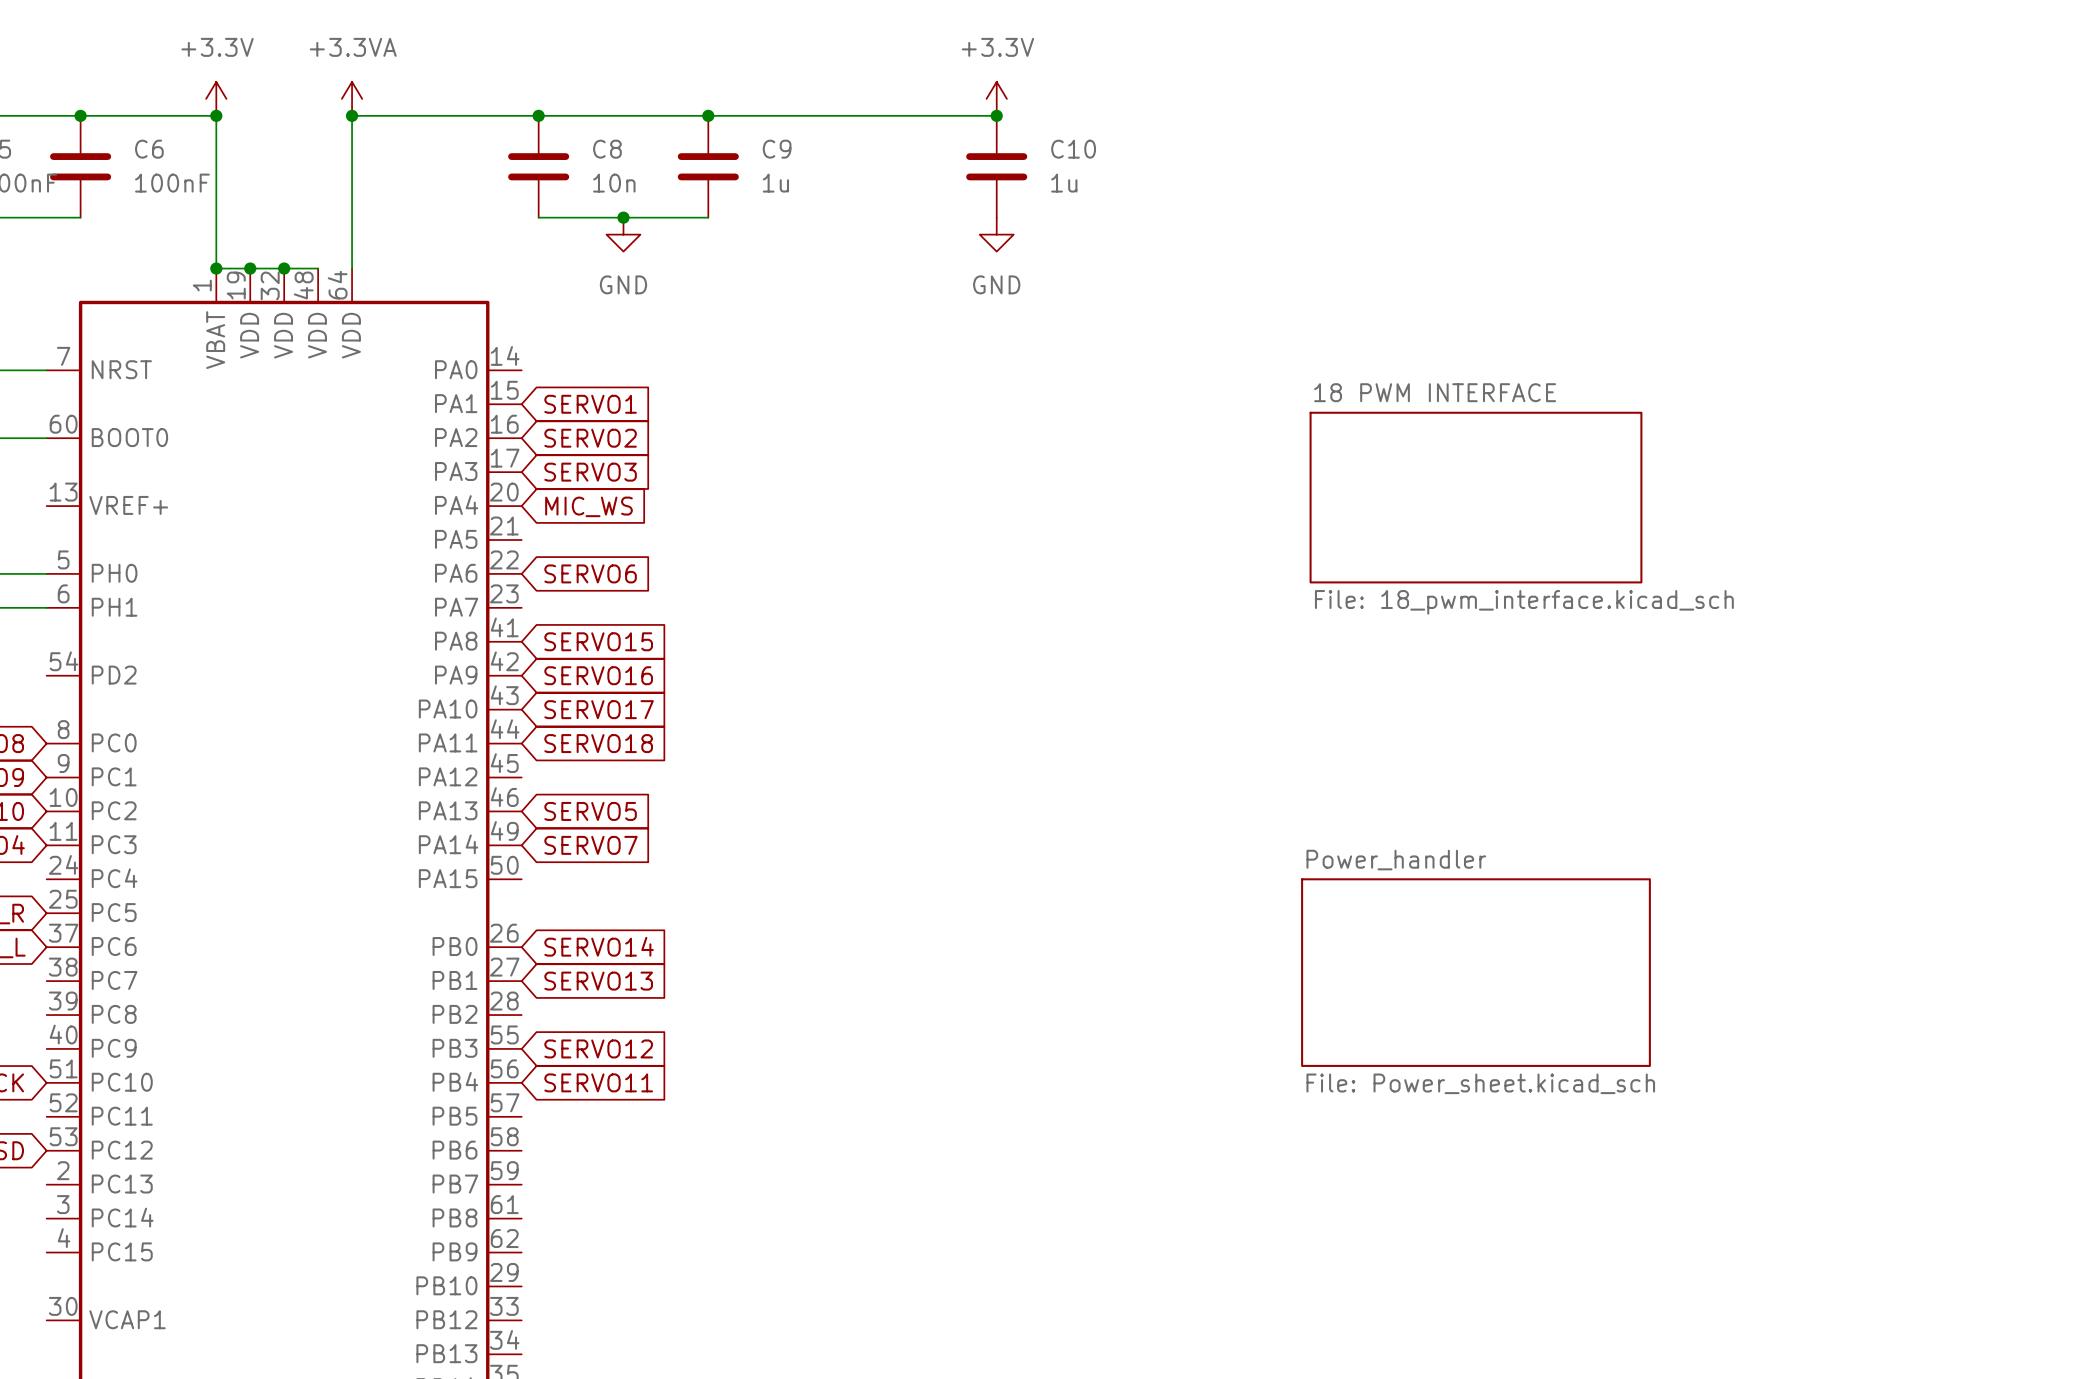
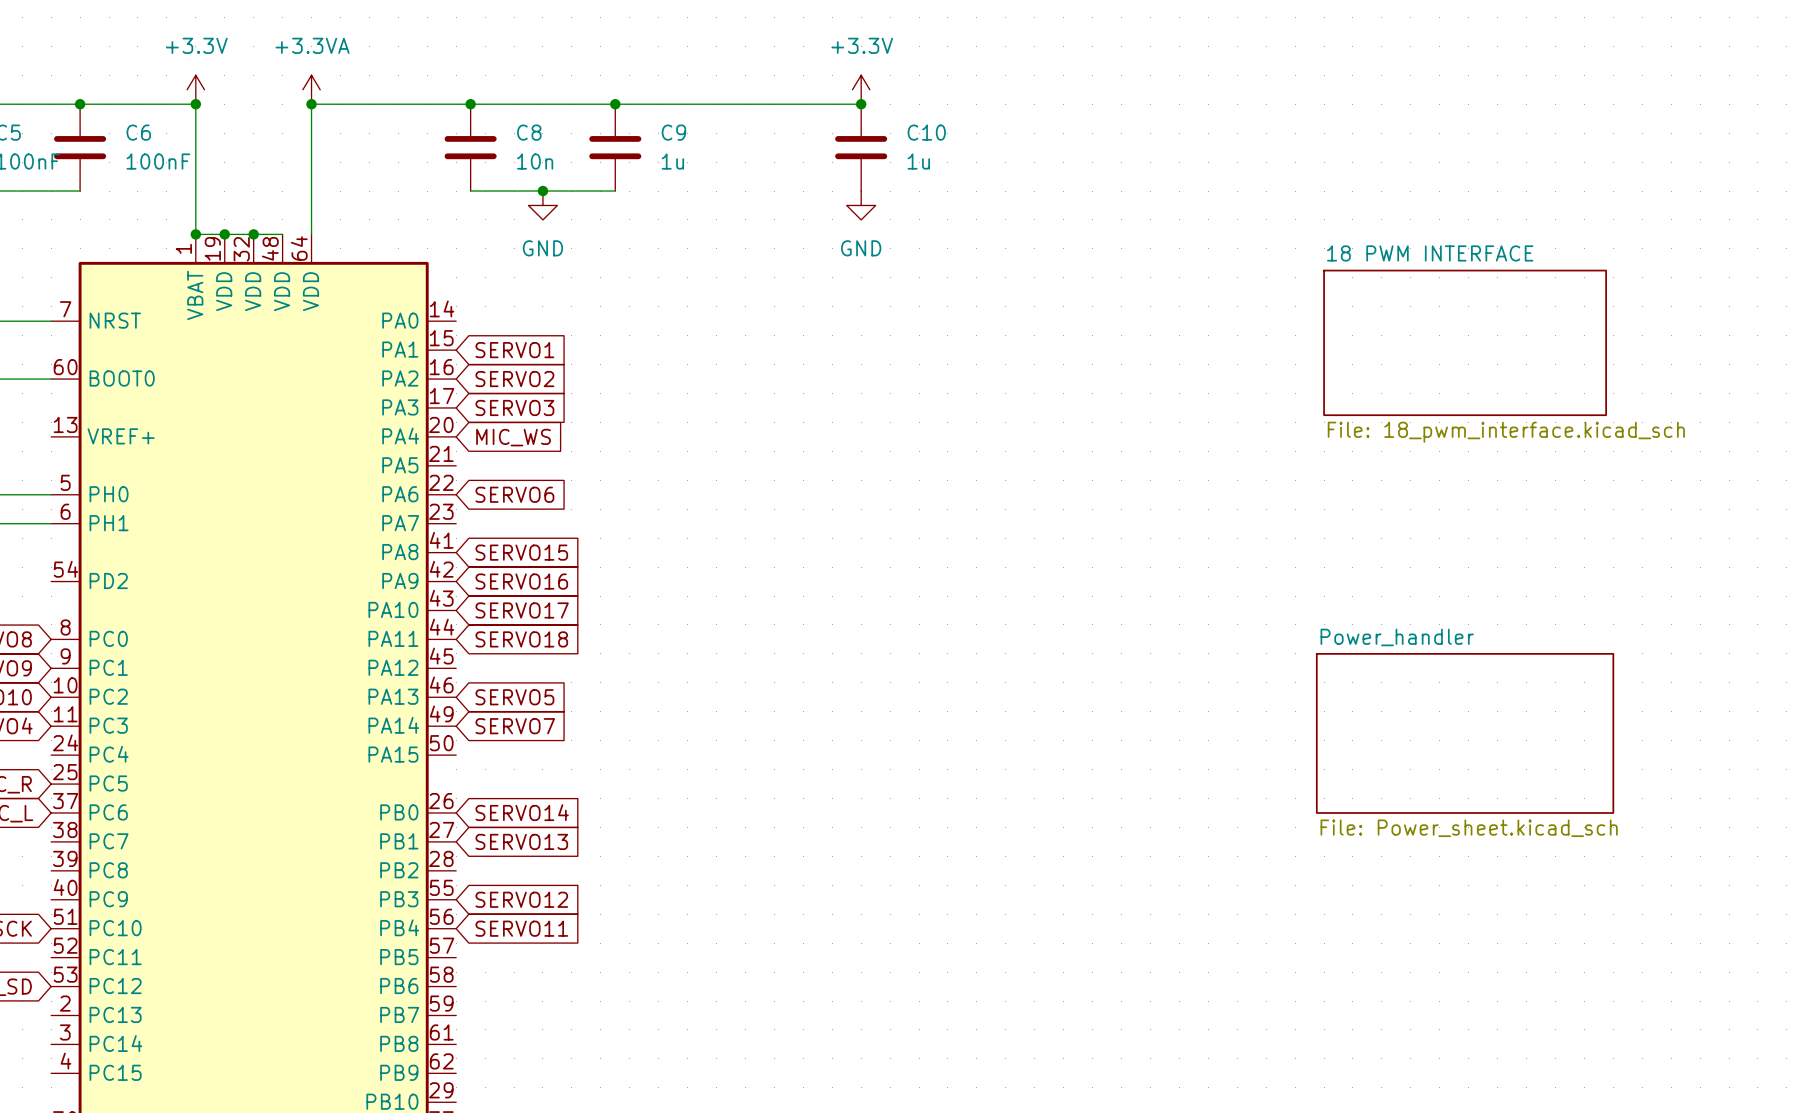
sheet 18 PWM INTERFACE position: (1475, 497) -> (1465, 342)
sheet Power_handler position: (1475, 972) -> (1465, 733)

